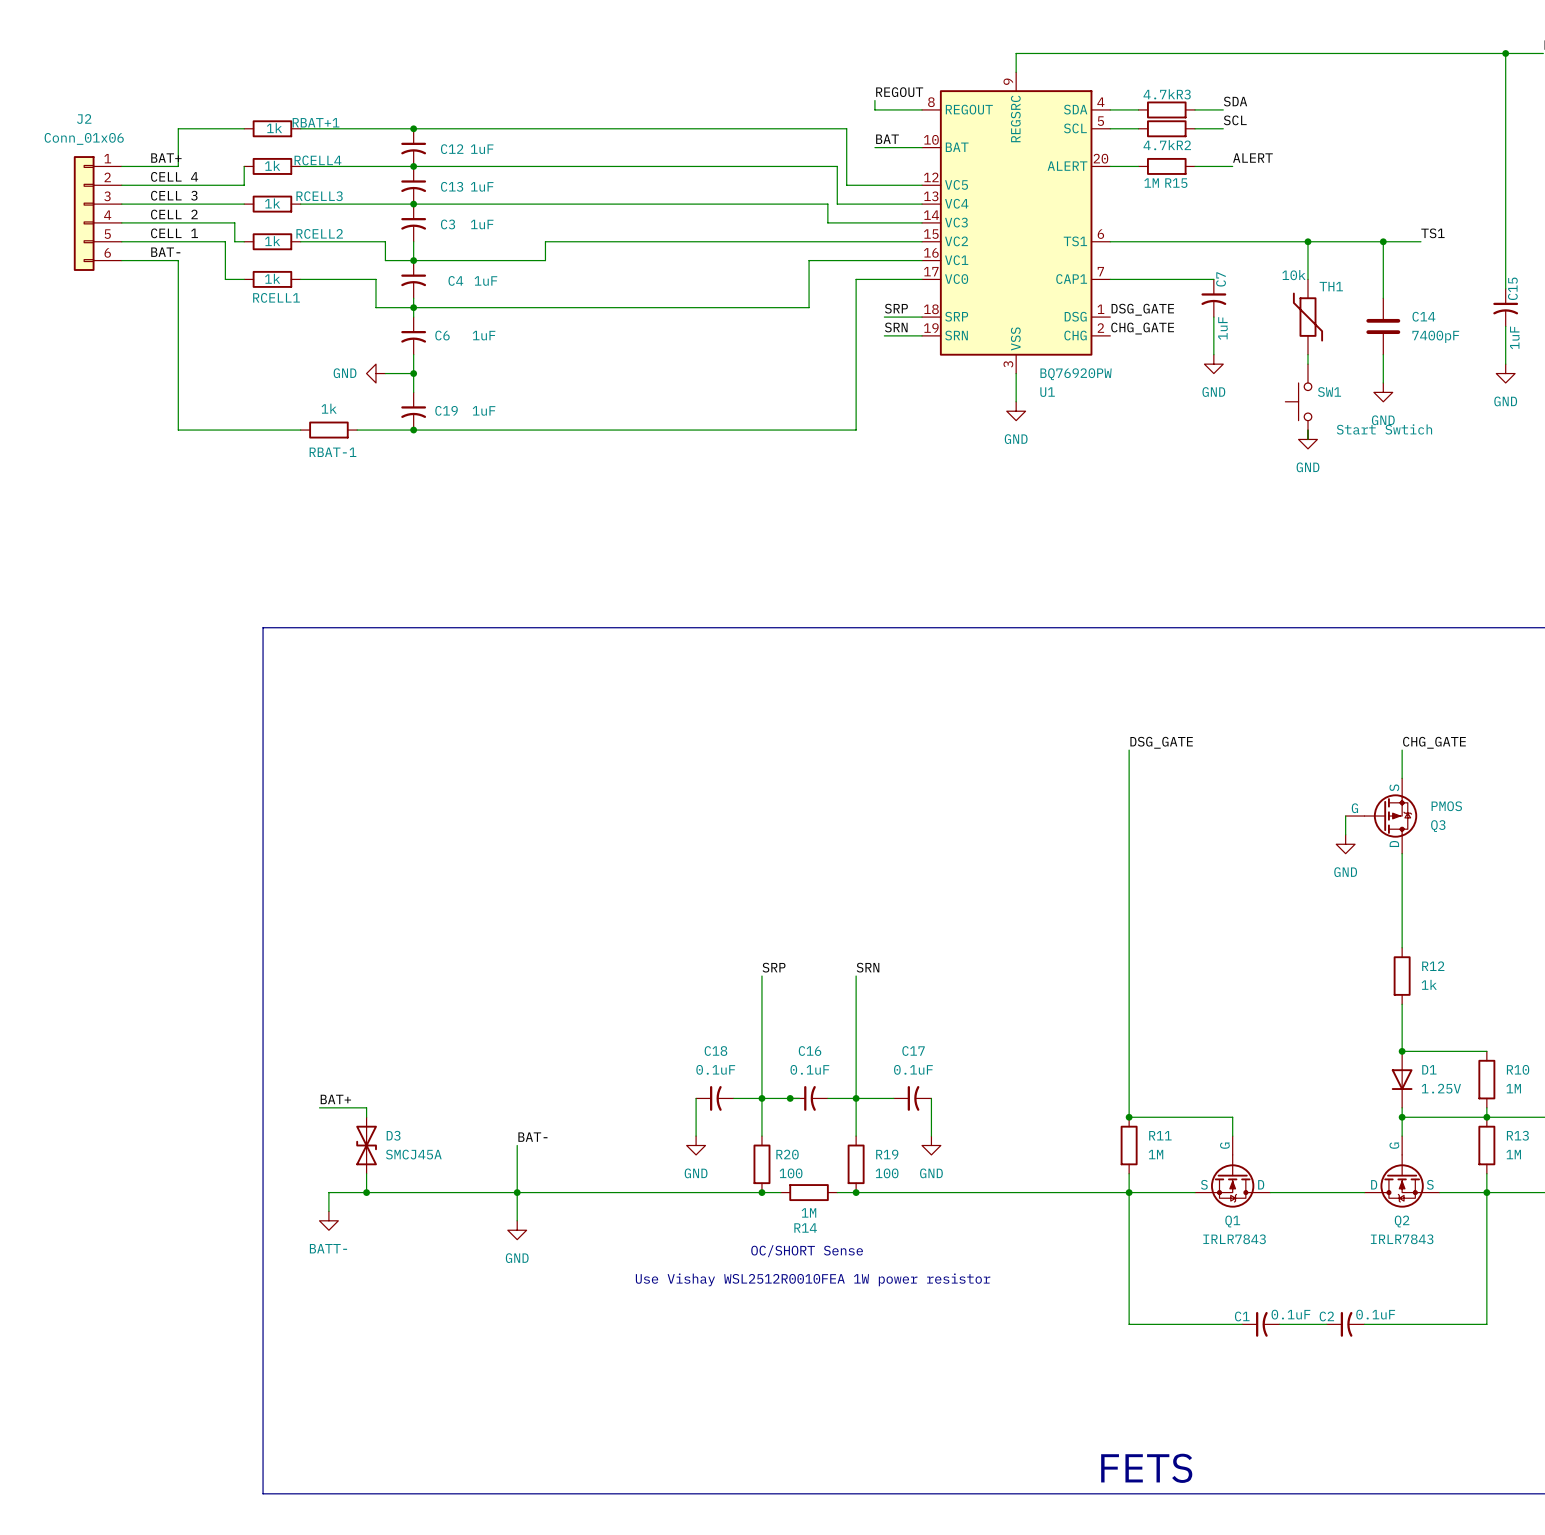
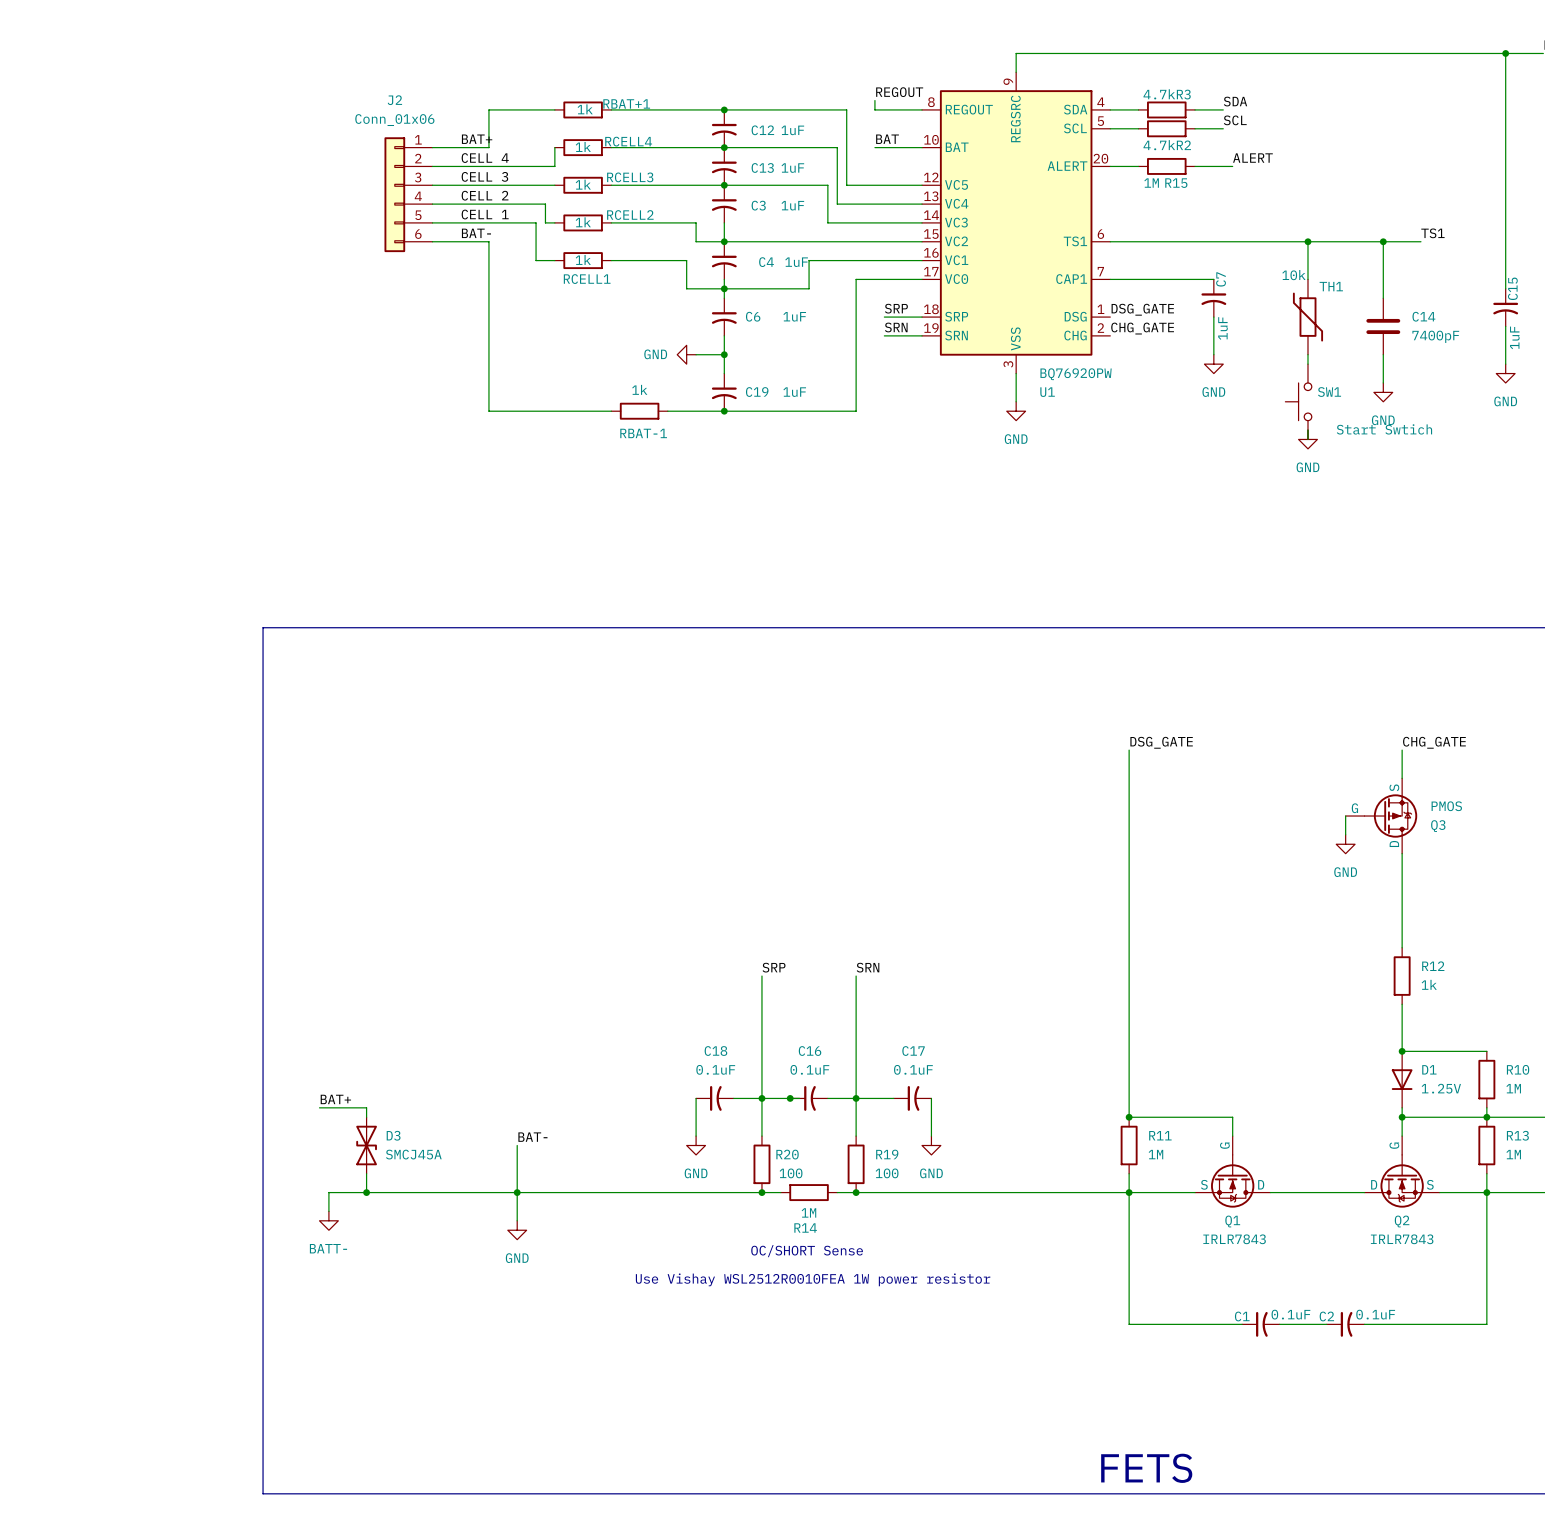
wire: none -> (554, 109) (488, 109) (488, 147) (432, 147)
junction: none -> (724, 109)
wire: (244, 128) (178, 128) (178, 166) (121, 166) -> none
RBAT+1 position: (272, 128) -> (583, 109)
wire: (300, 128) (846, 128) -> (611, 109) (846, 109) (846, 128)
junction: (413, 128) -> none
label: none -> BAT+ (477, 139)
C12 position: (413, 147) -> (724, 128)
junction: none -> (724, 147)
label: BAT+ (166, 158) -> none
label: none -> CELL 4 (485, 158)
wire: (244, 166) (244, 185) (121, 185) -> none
RCELL4 position: (272, 166) -> (583, 147)
wire: (300, 166) (432, 166) -> none
junction: (413, 166) -> none
wire: (554, 166) (837, 166) -> (611, 147) (837, 147) (837, 166)
label: CELL 4 (174, 176) -> none
label: none -> CELL 3 (484, 176)
C13 position: (413, 185) -> (724, 166)
wire: none -> (432, 185) (554, 185)
junction: none -> (724, 185)
label: CELL 3 (174, 195) -> none
label: none -> CELL 2 (485, 195)
wire: (121, 204) (244, 204) -> none
RCELL3 position: (272, 204) -> (583, 185)
wire: (300, 204) (432, 204) -> none
junction: (413, 204) -> none
wire: (545, 204) (827, 204) -> (611, 185) (827, 185) (827, 204)
wire: none -> (545, 204) (545, 222) (554, 222)
J2 position: (97, 213) -> (408, 194)
label: CELL 2 (174, 214) -> none
label: none -> CELL 1 (485, 214)
wire: (121, 222) (234, 222) (234, 241) (244, 241) -> none
C3 position: (413, 222) -> (724, 204)
wire: none -> (724, 222) (724, 241)
label: CELL 1 (174, 233) -> none
label: none -> BAT- (476, 233)
wire: (121, 241) (225, 241) (225, 279) (244, 279) -> none
RCELL2 position: (272, 241) -> (583, 222)
wire: (300, 241) (385, 241) (385, 260) (536, 260) -> (432, 222) (536, 222) (536, 260)
wire: (413, 241) (413, 260) -> (554, 147) (554, 166)
wire: none -> (432, 241) (488, 241) (488, 411) (611, 411)
wire: (696, 241) (545, 241) (545, 260) -> (696, 241) (696, 222) (611, 222)
junction: none -> (724, 241)
label: BAT- (165, 252) -> none
wire: (121, 260) (178, 260) (178, 430) (300, 430) -> none
junction: (413, 260) -> none
wire: none -> (545, 260) (554, 260)
RCELL1 position: (272, 279) -> (583, 260)
wire: (300, 279) (376, 279) (376, 307) (809, 307) (809, 288) -> (611, 260) (686, 260) (686, 288) (809, 288)
C4 position: (413, 279) -> (724, 260)
wire: none -> (724, 279) (724, 298)
junction: none -> (724, 288)
wire: (413, 298) (413, 317) -> none
junction: (413, 307) -> none
C6 position: (413, 335) -> (724, 317)
wire: none -> (724, 335) (724, 373)
wire: (413, 354) (413, 392) -> none
power symbol: none -> GND (686, 354)
wire: none -> (696, 354) (724, 354)
junction: none -> (724, 354)
power symbol: GND (376, 373) -> none
wire: (385, 373) (413, 373) -> none
junction: (413, 373) -> none
C19 position: (413, 411) -> (724, 392)
junction: none -> (724, 411)
wire: (856, 411) (856, 430) (357, 430) -> (856, 411) (667, 411)
RBAT-1 position: (328, 430) -> (639, 411)
junction: (413, 430) -> none

